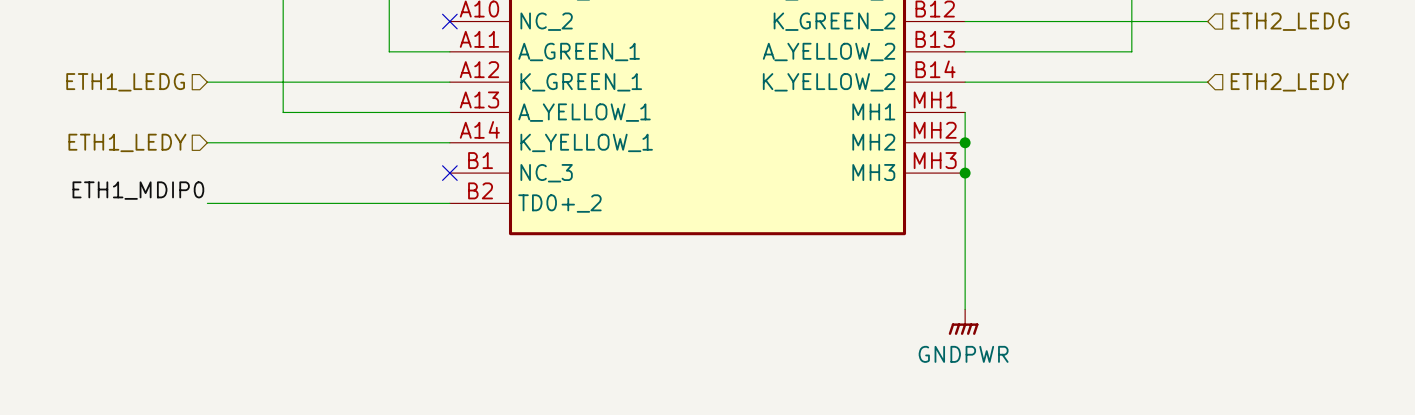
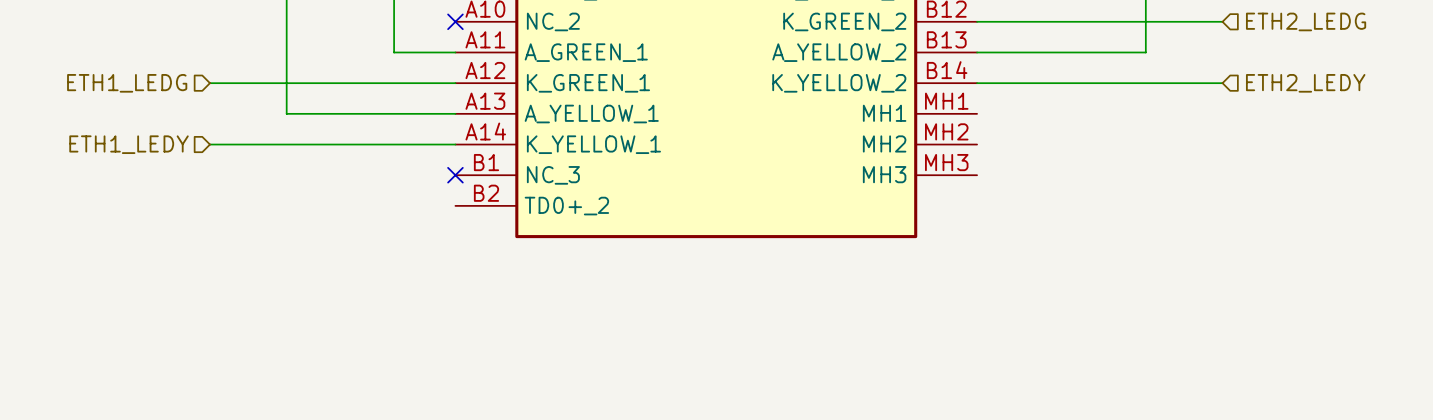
wire: (965, 112) (965, 309) -> none
junction: (965, 142) -> none
junction: (965, 173) -> none
label: ETH1_MDIP0 (138, 190) -> none
wire: (207, 203) (449, 203) -> none
power symbol: GNDPWR (963, 322) -> none

